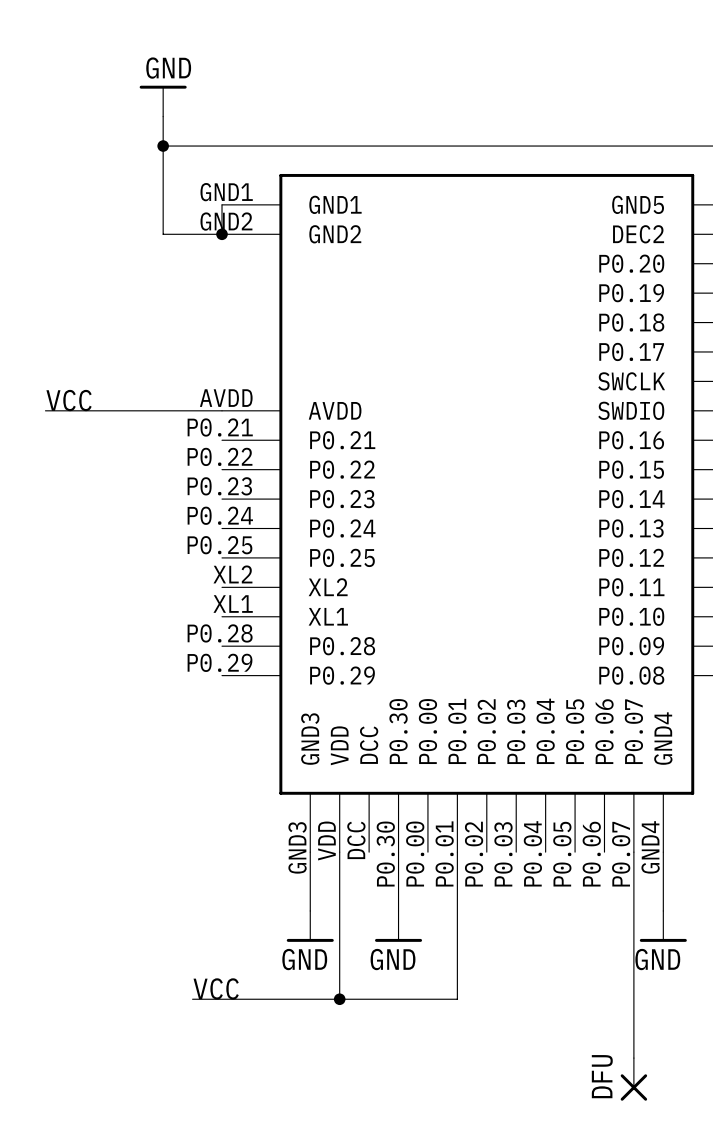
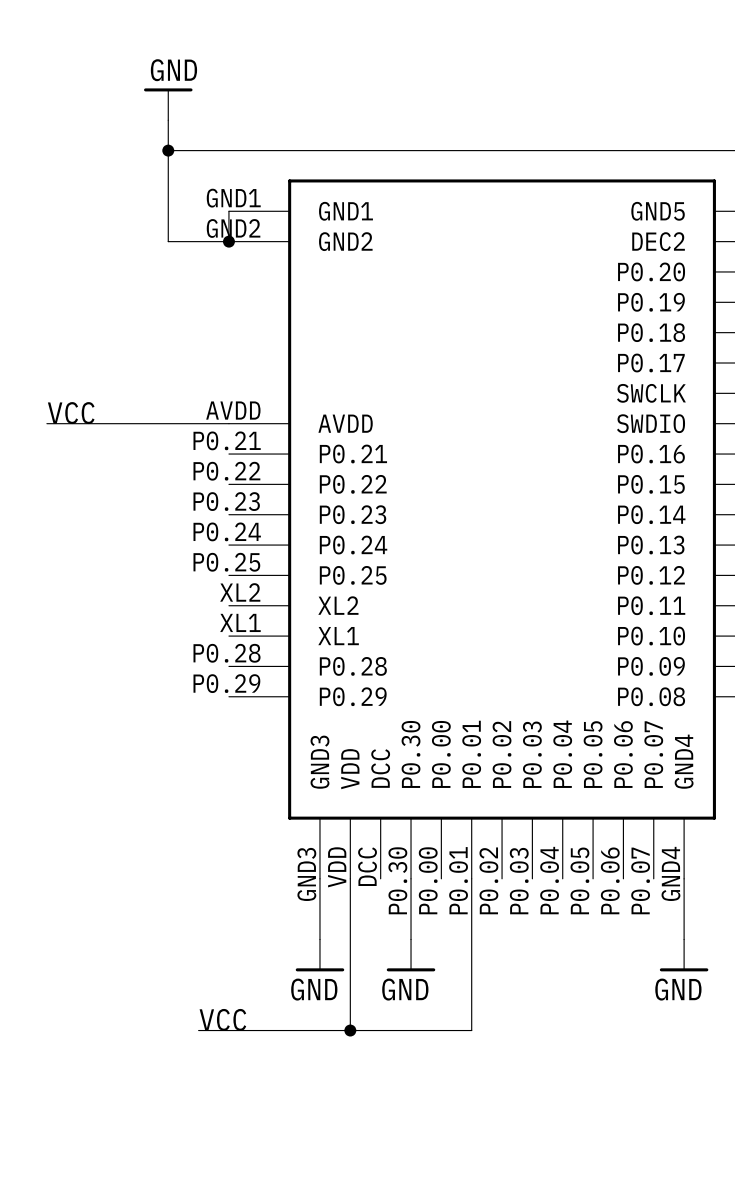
wire: (633, 852) (633, 1058) -> none
DFU: (633, 1079) -> none

